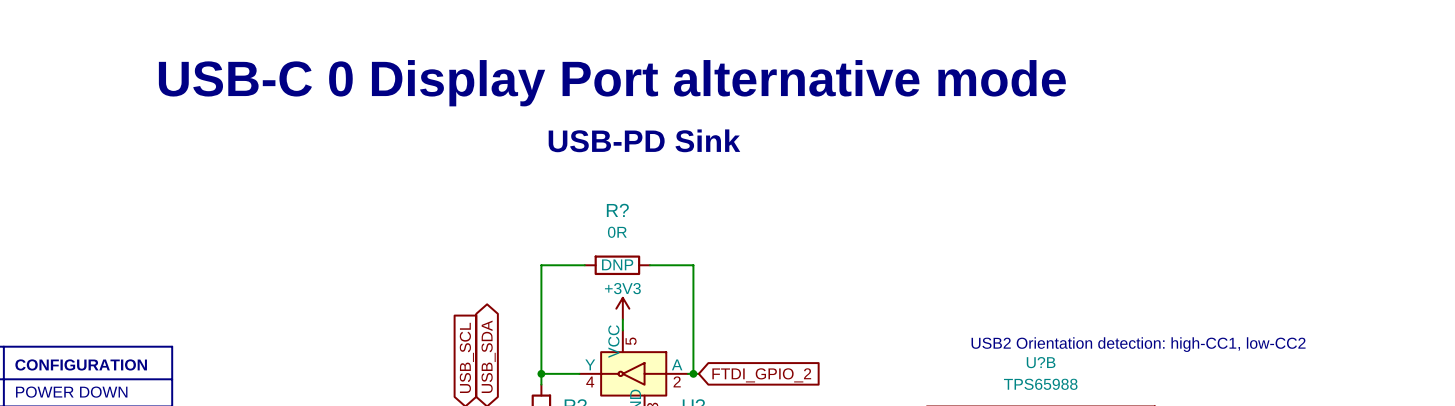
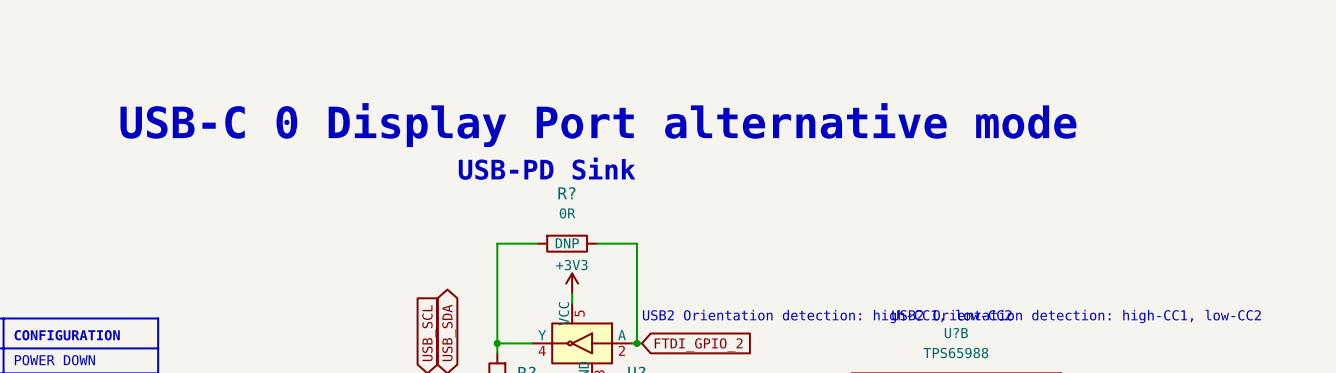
text position: USB-C 0 Display Port alternative mode (612, 83) -> USB-C 0 Display Port alternative mode (598, 125)
text position: USB-PD Sink (644, 140) -> USB-PD Sink (547, 168)
text: none -> USB2 Orientation detection: high-CC1, low-CC2 (827, 316)

